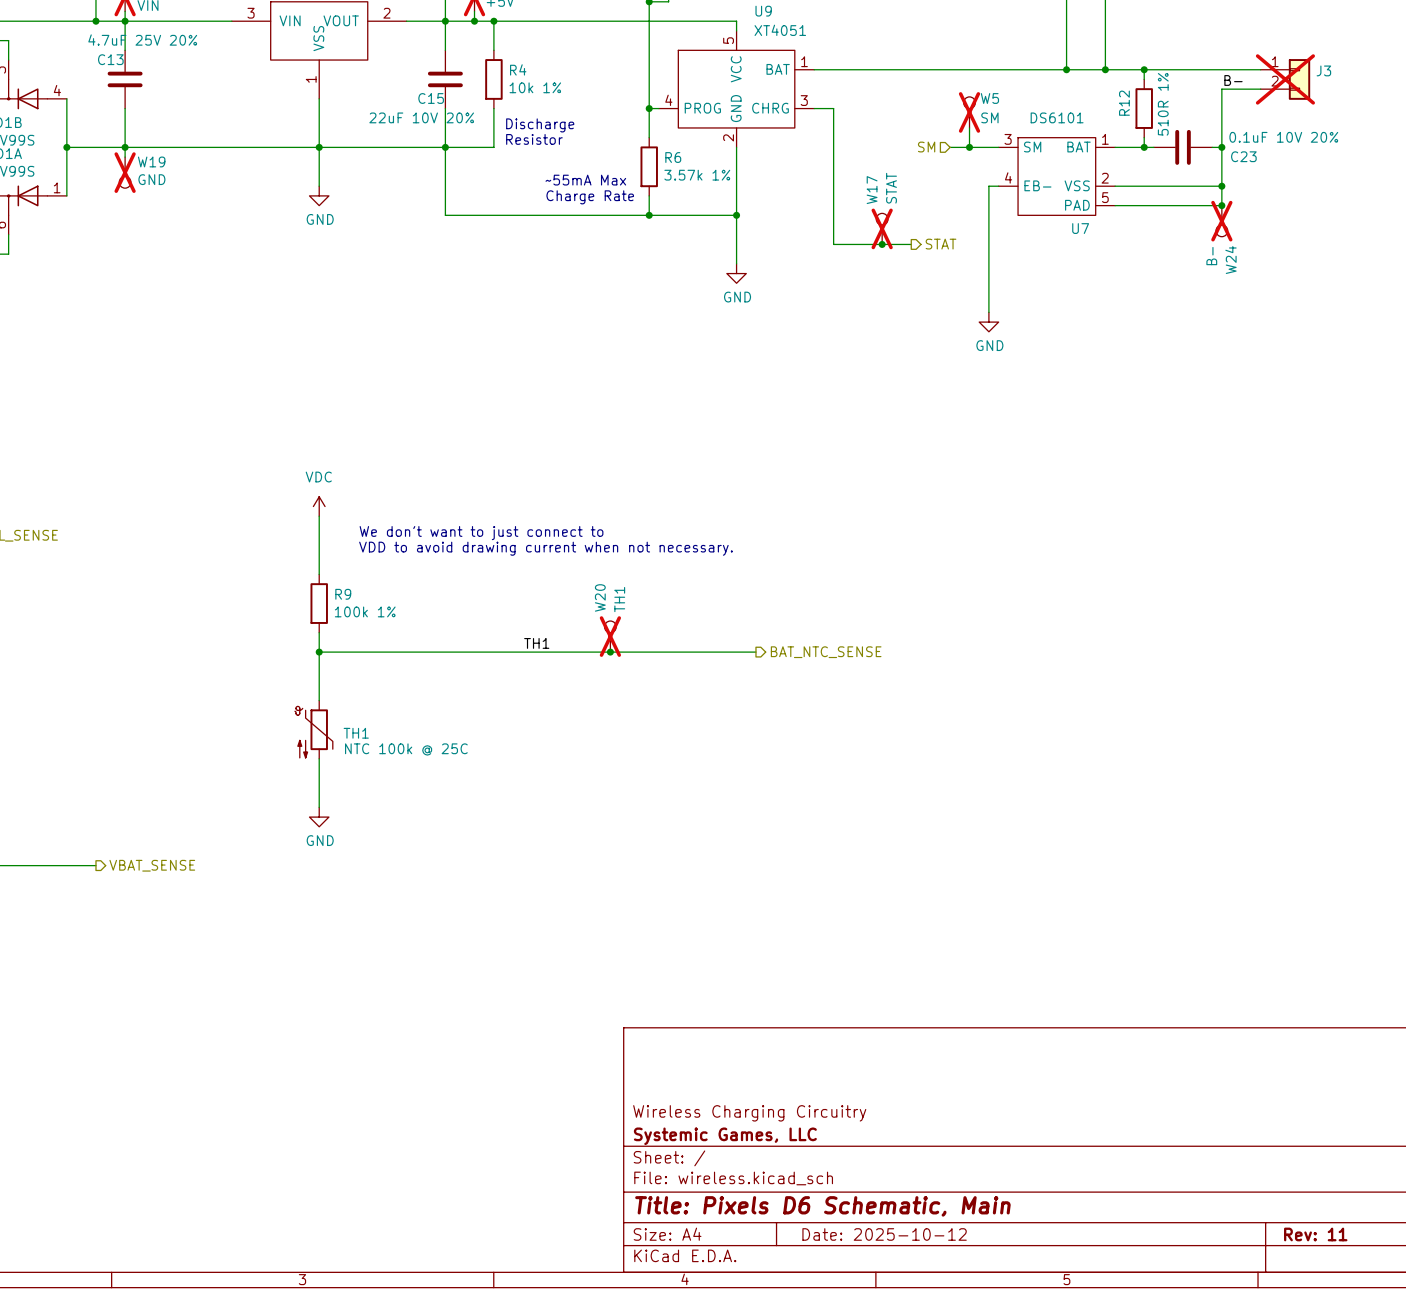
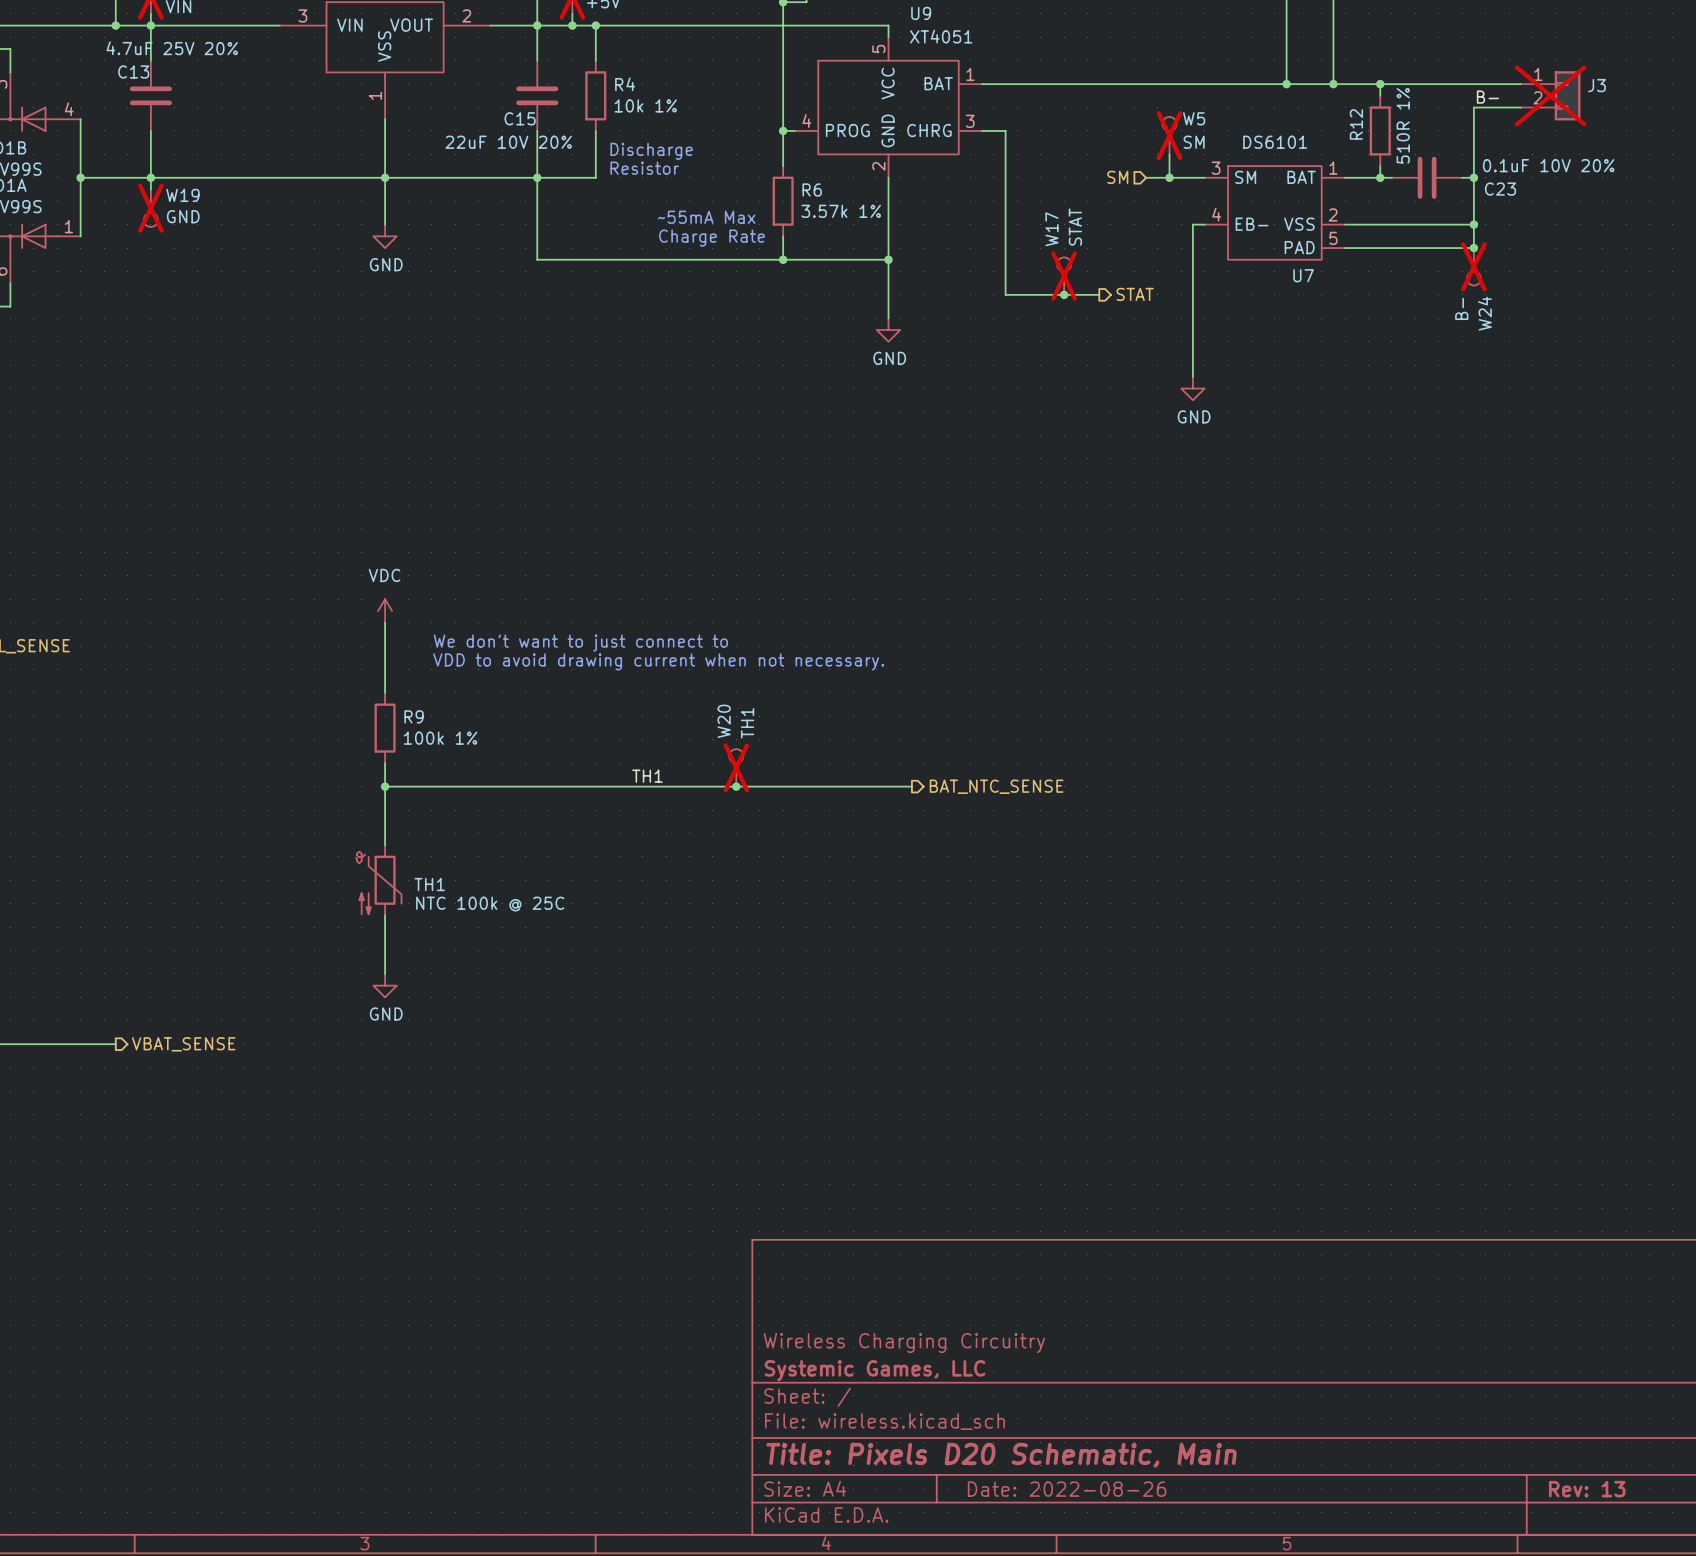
title block: Title: Pixels D6 Schematic, Main (822, 1206) -> Title: Pixels D20 Schematic, Main (1001, 1455)
title block: Date: 2025-10-12 (884, 1234) -> Date: 2022-08-26 (1067, 1489)
title block: Rev: 11 (1315, 1234) -> Rev: 13 (1587, 1489)

